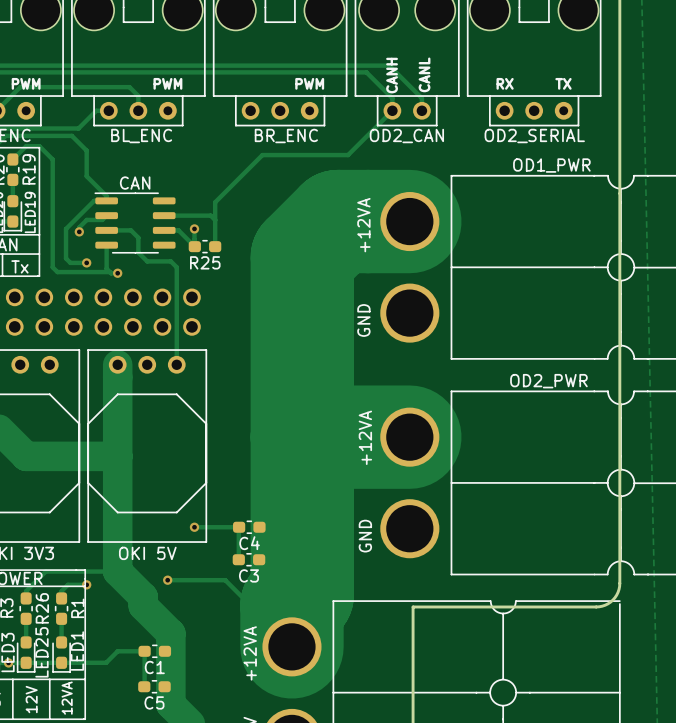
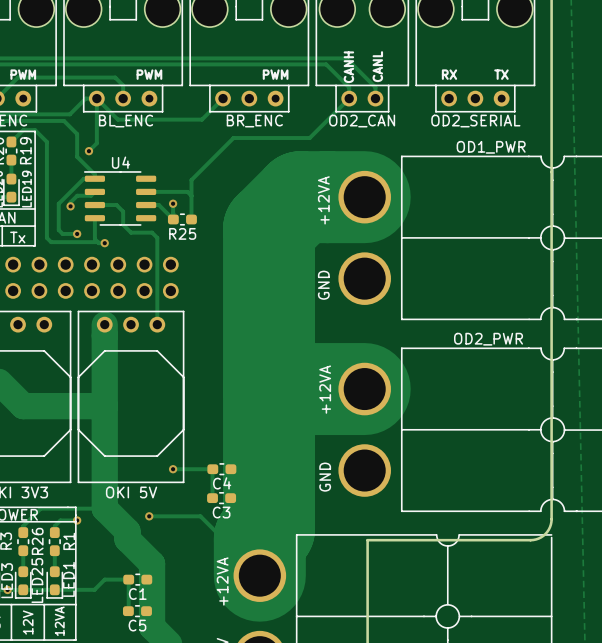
track: none -> (223, 98) (202, 119) (117, 119) (96, 98) (96, 143) (88, 151)
via: none -> (88, 151)
CAN name: CAN (135, 183) -> U4 (121, 162)

